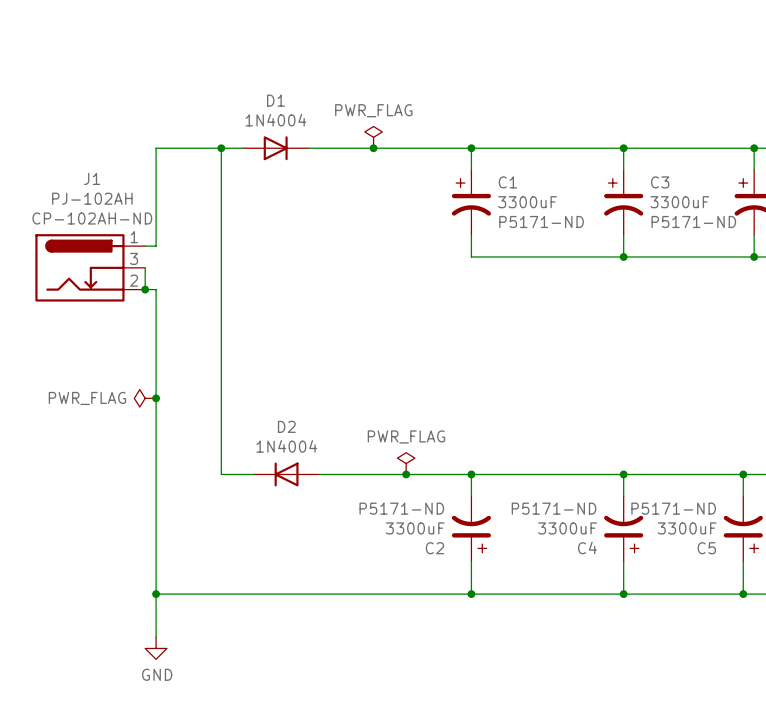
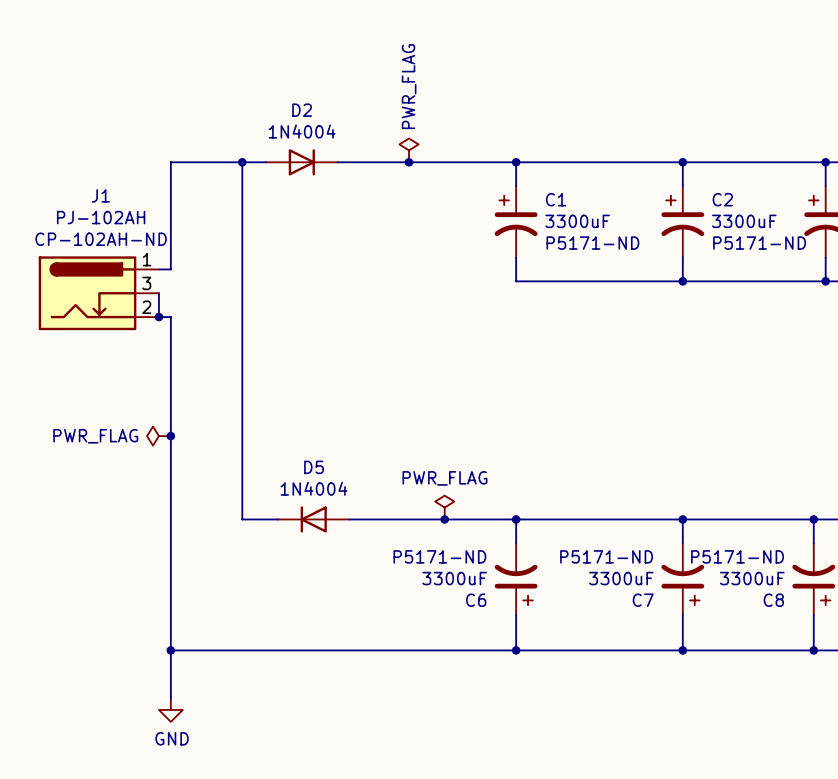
D1 name: D1 (275, 100) -> D2 (302, 110)
power symbol text rotation: 0° (373, 110) -> 90° counterclockwise (409, 86)
C3 name: C3 (660, 182) -> C2 (722, 199)
D2 name: D2 (286, 426) -> D5 (314, 467)
C4 name: C4 (587, 547) -> C7 (643, 600)
C2 name: C2 (434, 548) -> C6 (476, 600)
C5 name: C5 (706, 548) -> C8 (773, 600)

